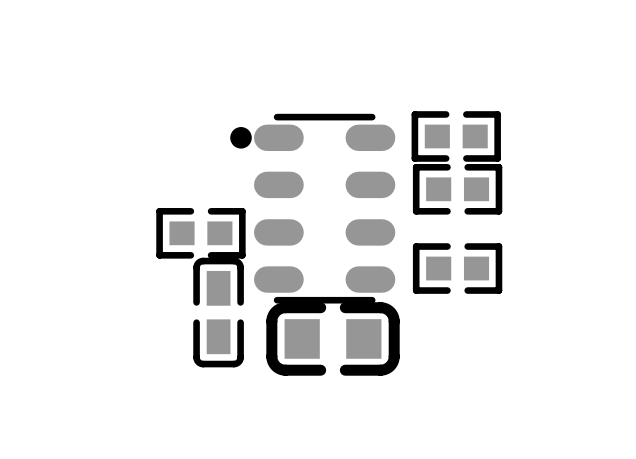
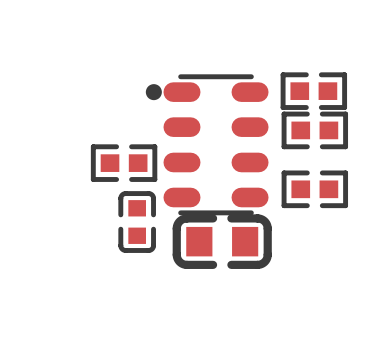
part footprint: [193, 257, 244, 368] -> [118, 191, 156, 253]

